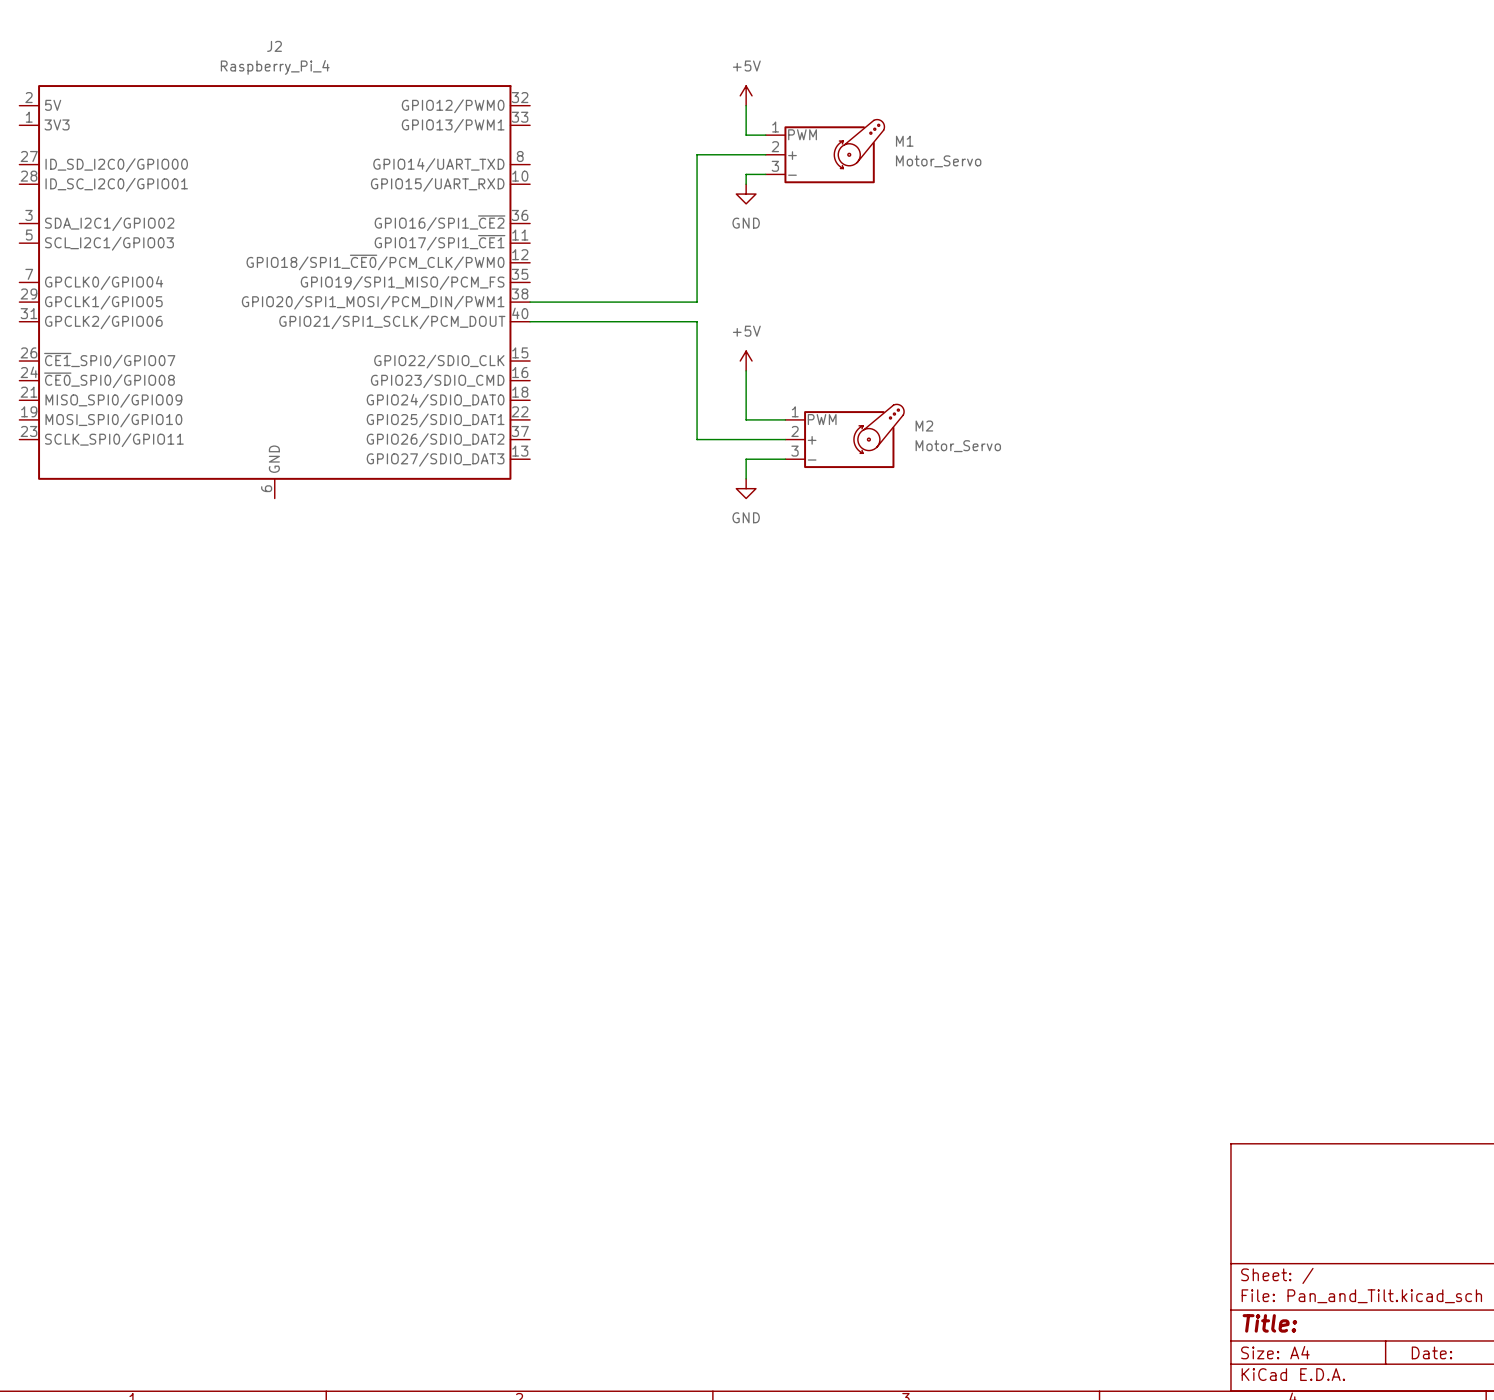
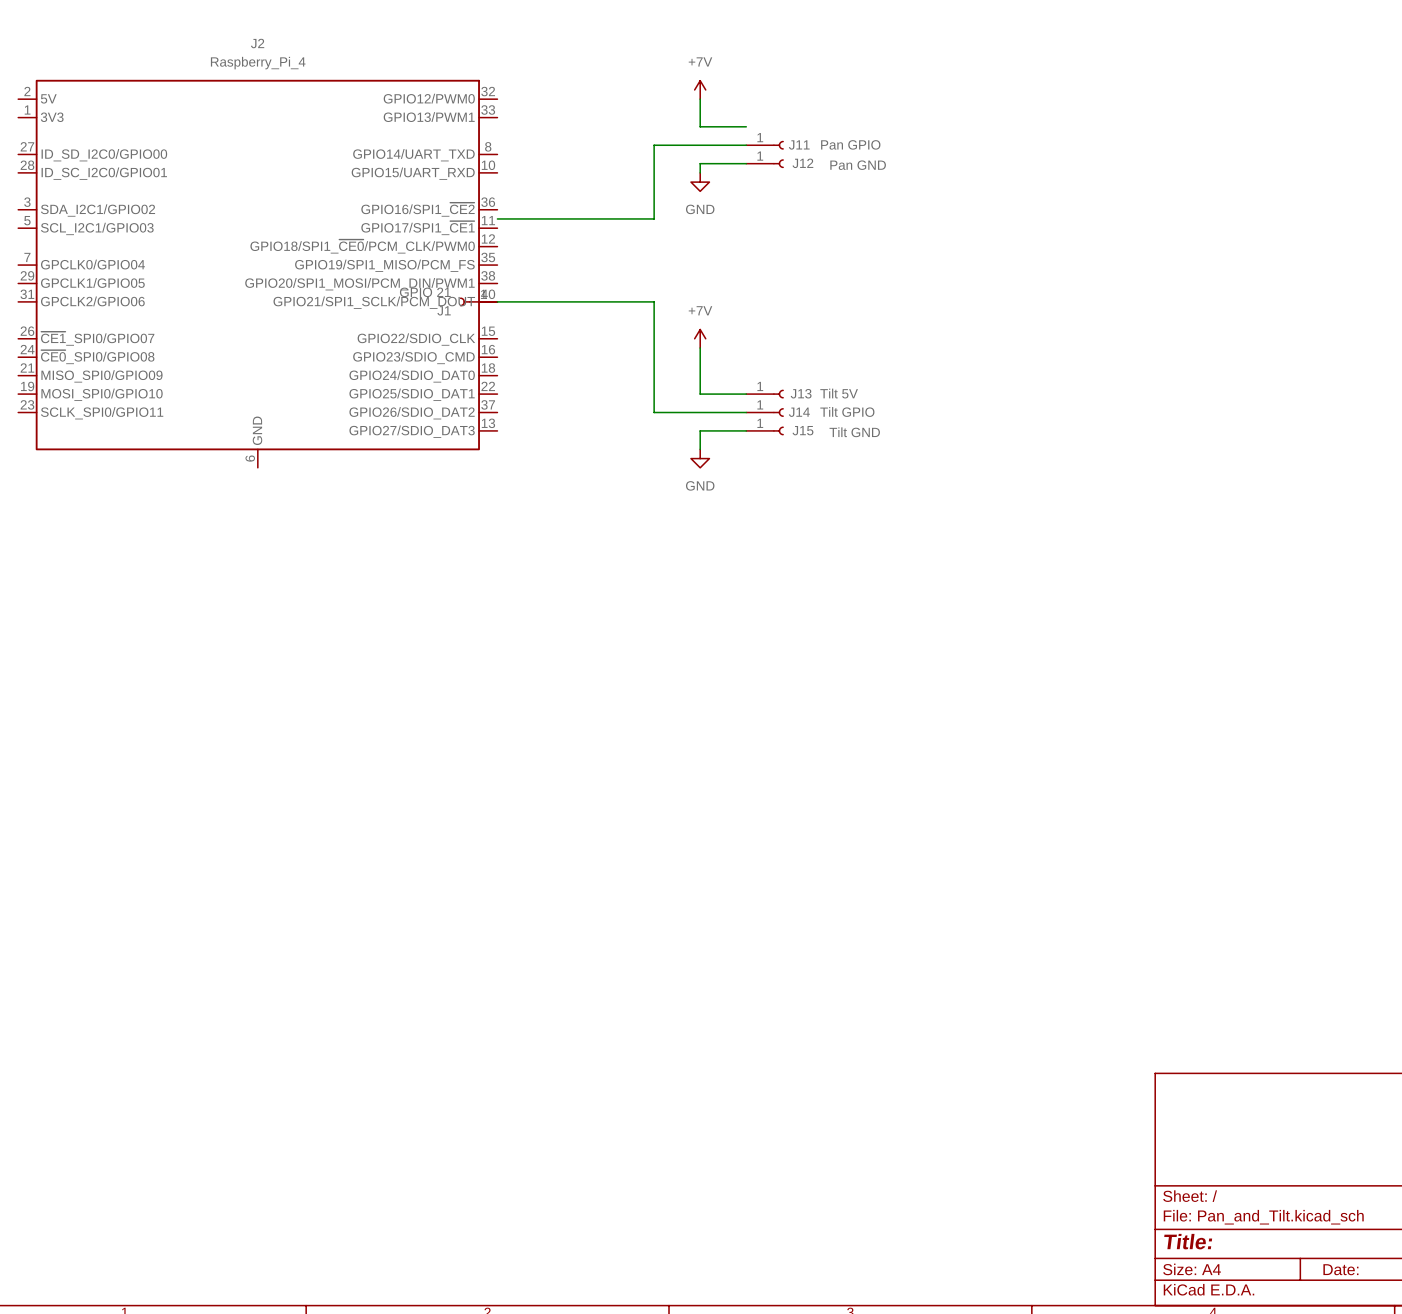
power symbol: +5V (746, 95) -> +7V (700, 89)
M1: Motor_Servo (825, 151) -> none
J11: none -> Pan GPIO (764, 145)
J12: none -> Pan GND (764, 163)
wire: (697, 233) (697, 302) (530, 302) -> (654, 218) (497, 218)
J1: none -> GPIO 21 (478, 301)
power symbol: +5V (746, 361) -> +7V (700, 338)
J13: none -> Tilt 5V (764, 394)
M2: Motor_Servo (844, 436) -> none
J14: none -> Tilt GPIO (764, 412)
J15: none -> Tilt GND (764, 430)

